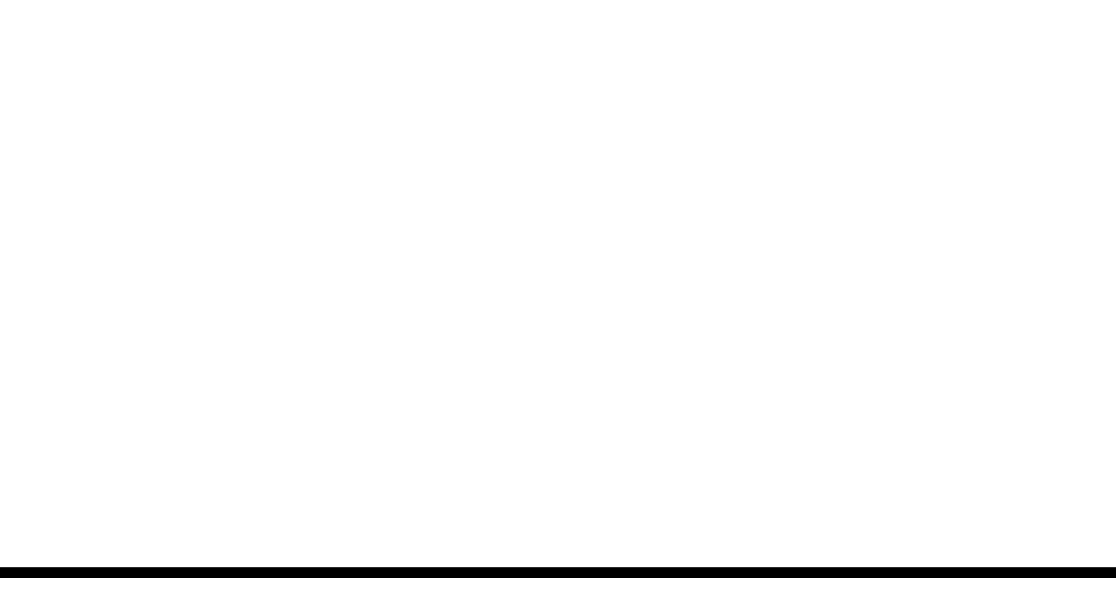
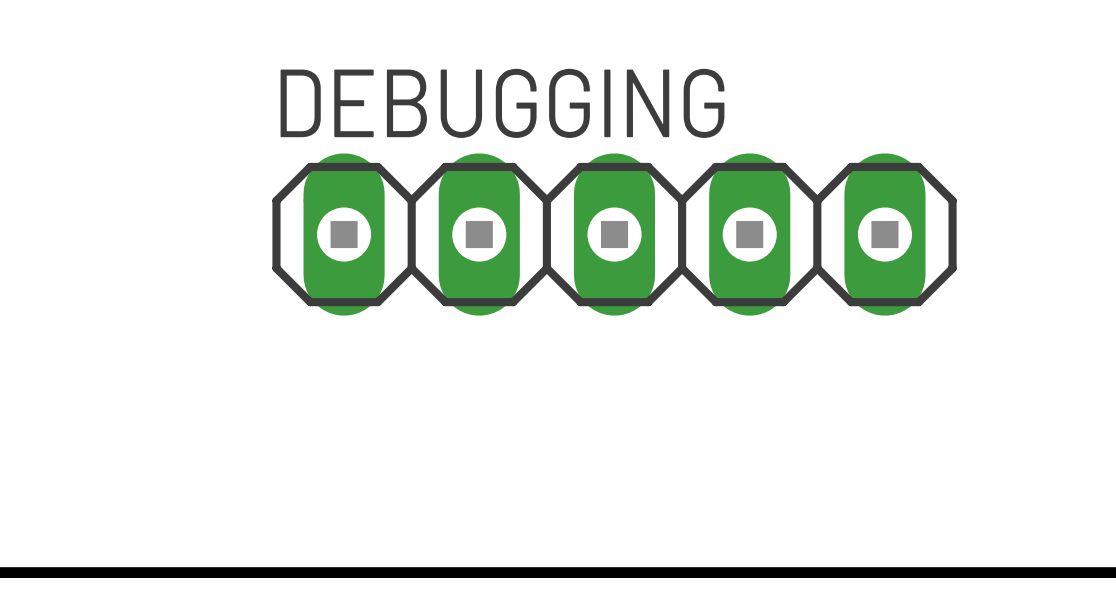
DEBUGGING: none -> (614, 234)

